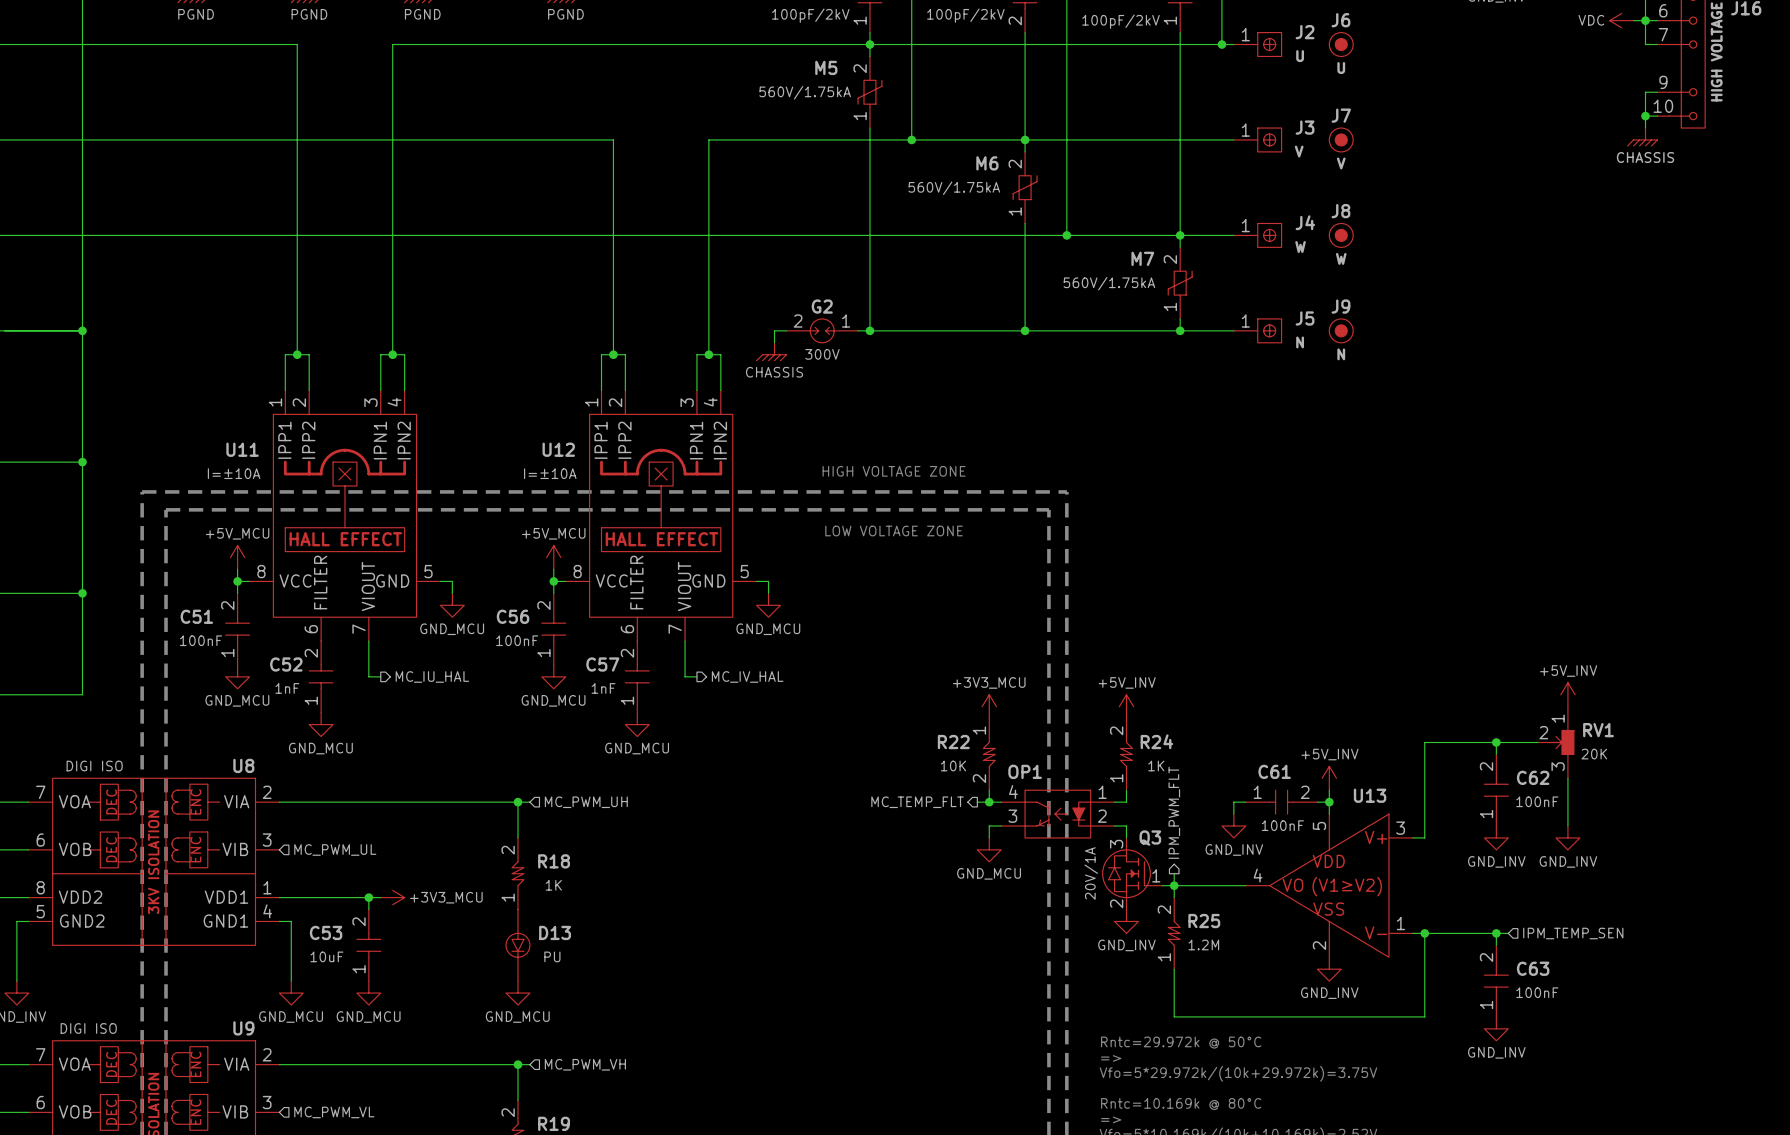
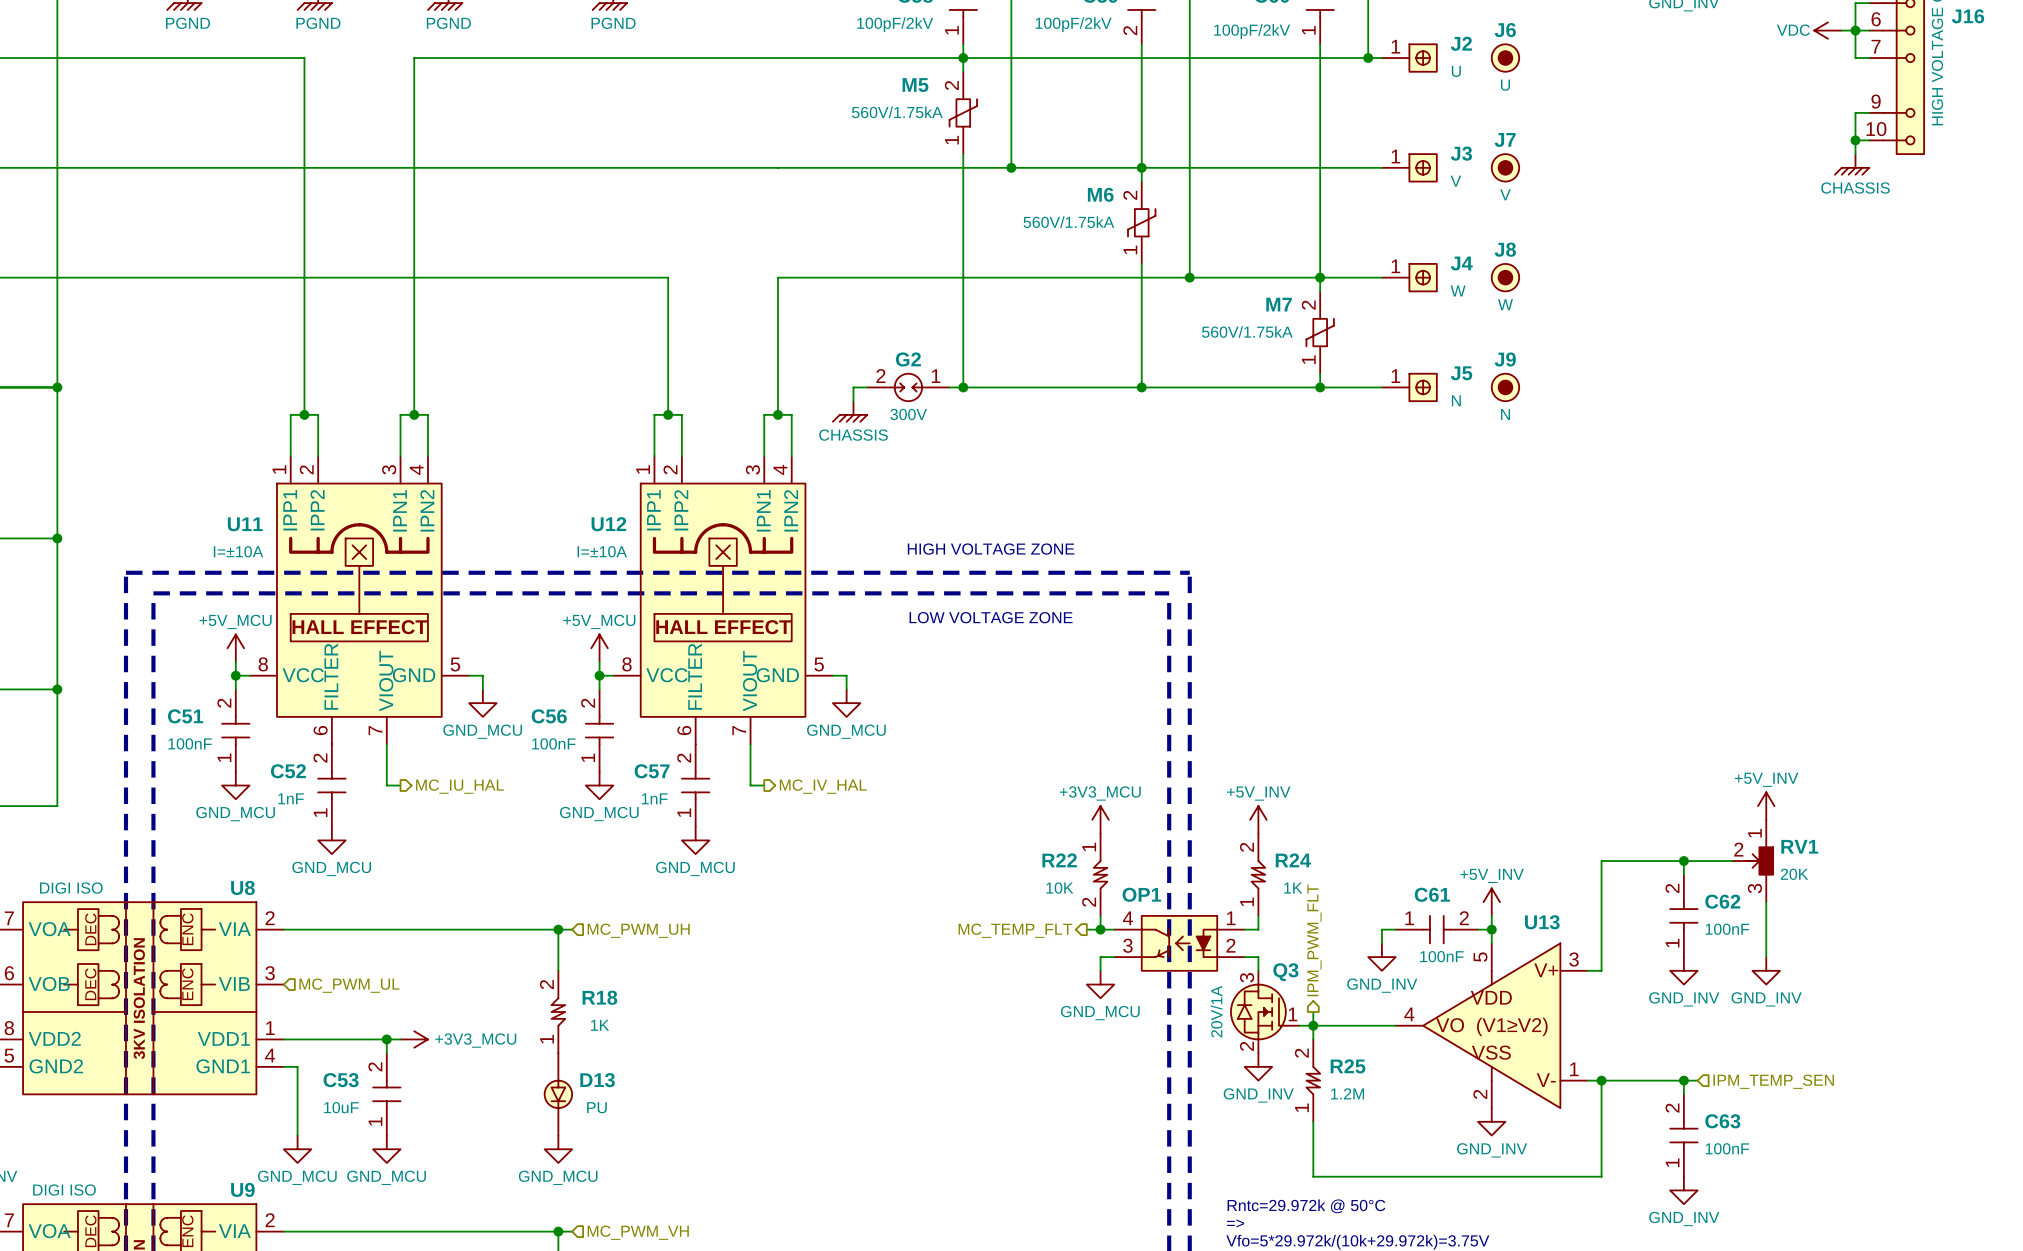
wire: (613, 139) (613, 235) (708, 235) (708, 139) -> (668, 167) (777, 167)

